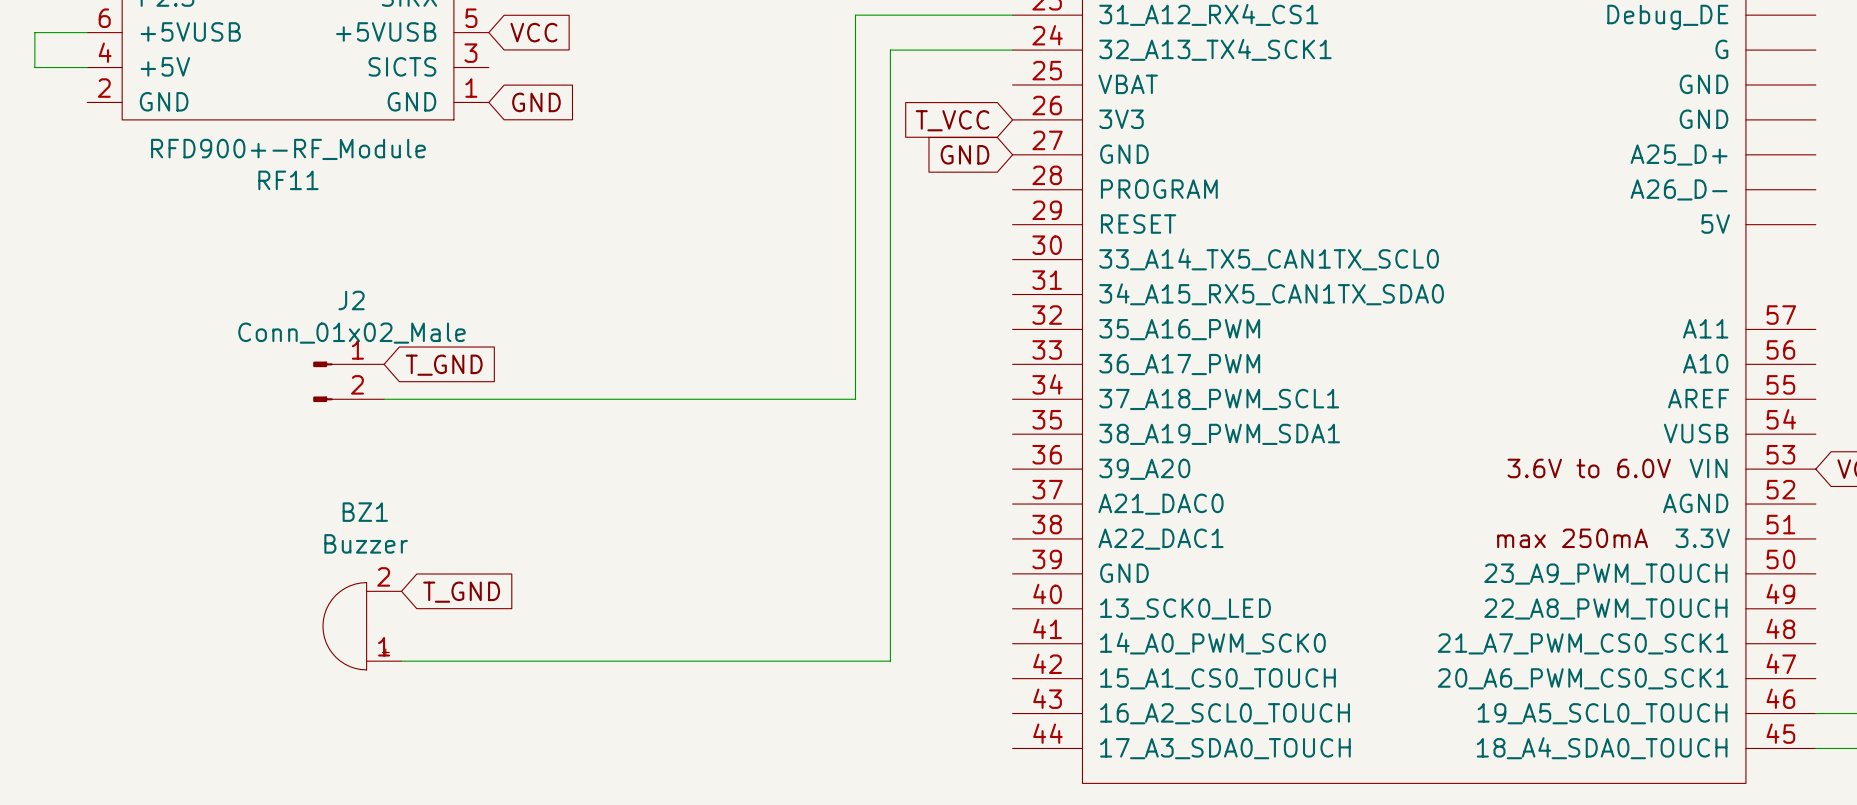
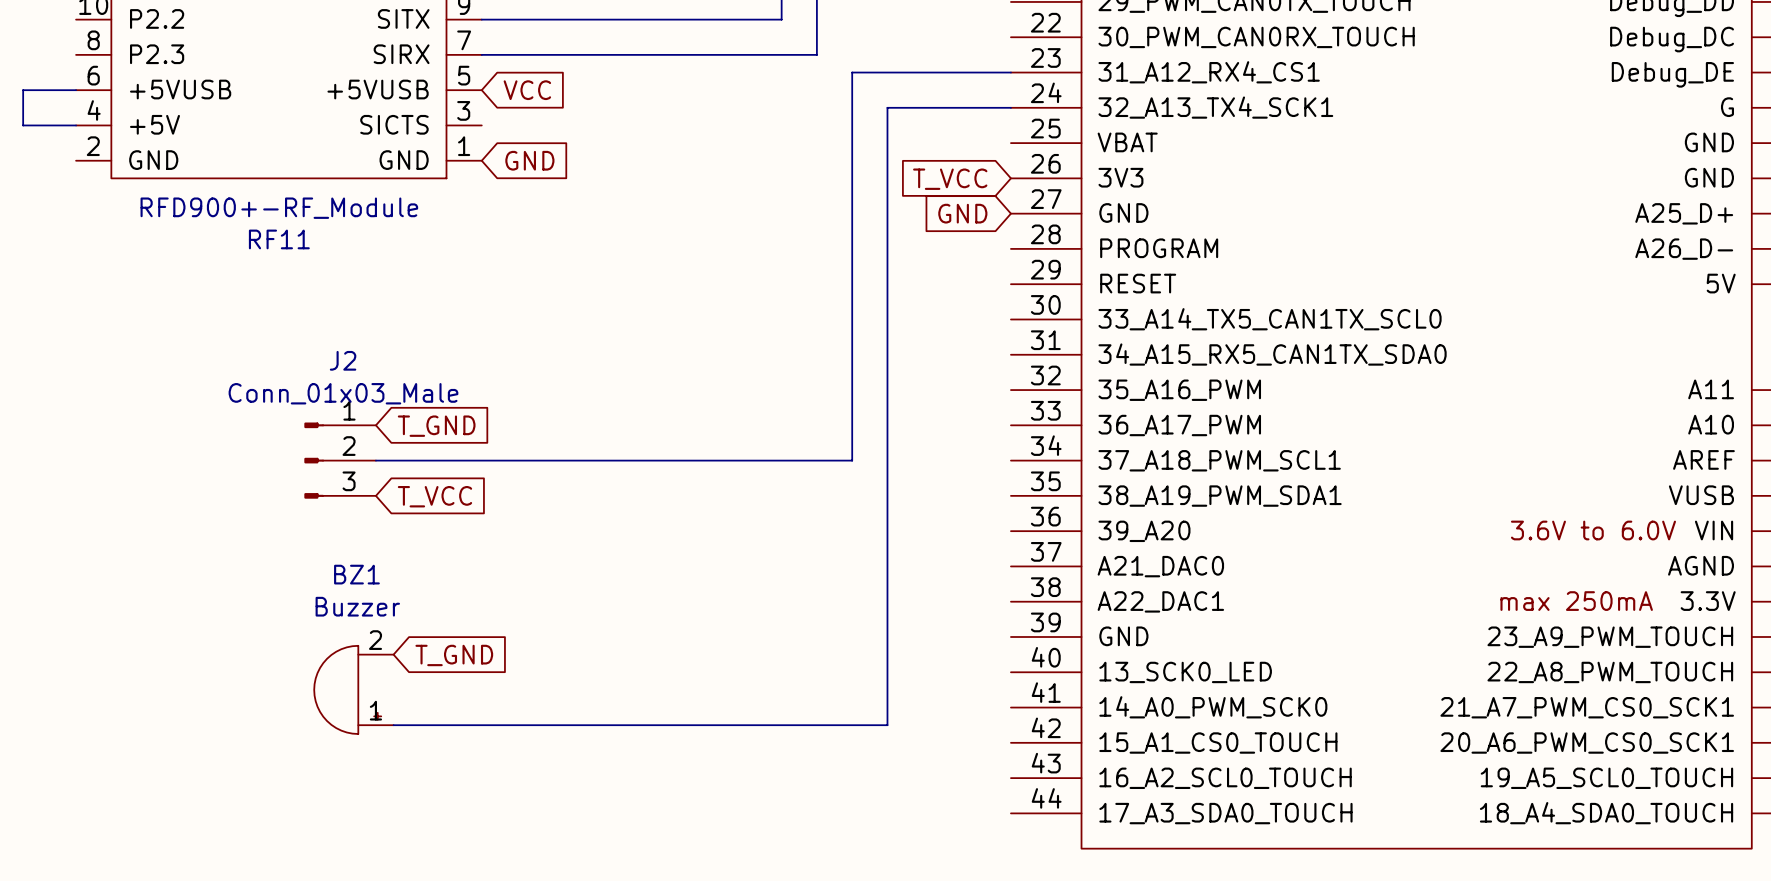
J2 value: Conn_01x02_Male (351, 333) -> Conn_01x03_Male (343, 393)
J2 symbol: [313, 361, 385, 403] -> [304, 422, 376, 499]
global label: none -> T_VCC (434, 496)

